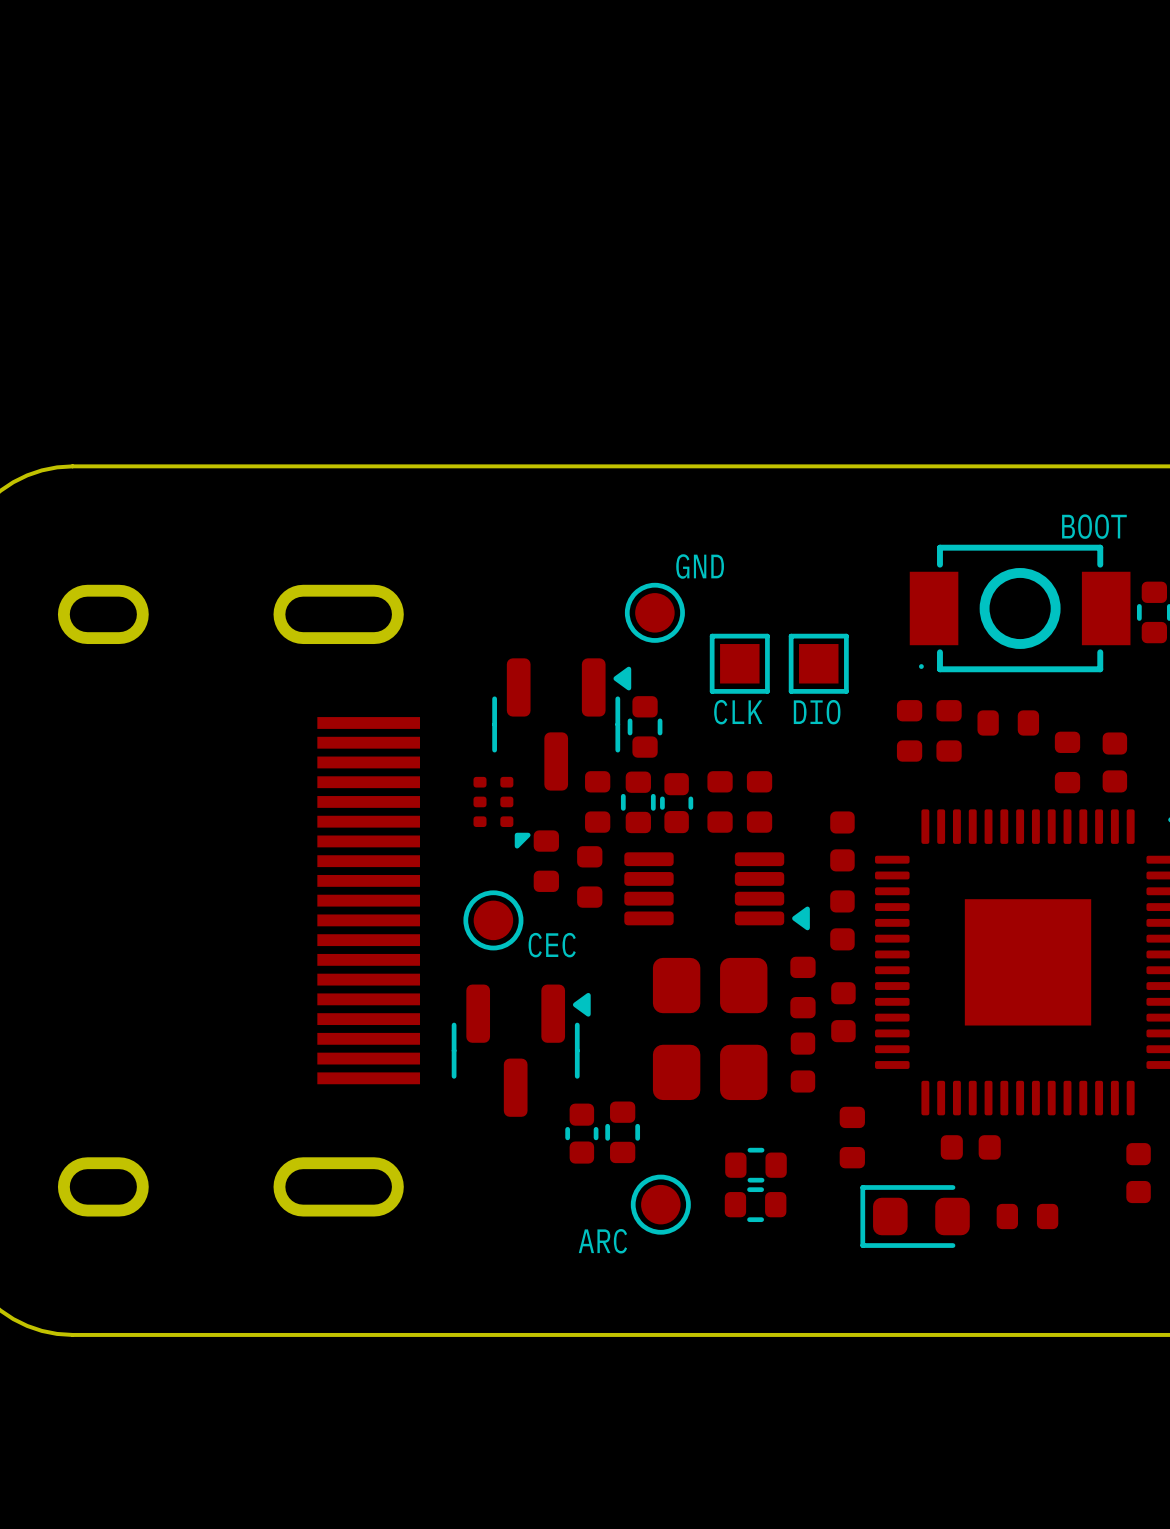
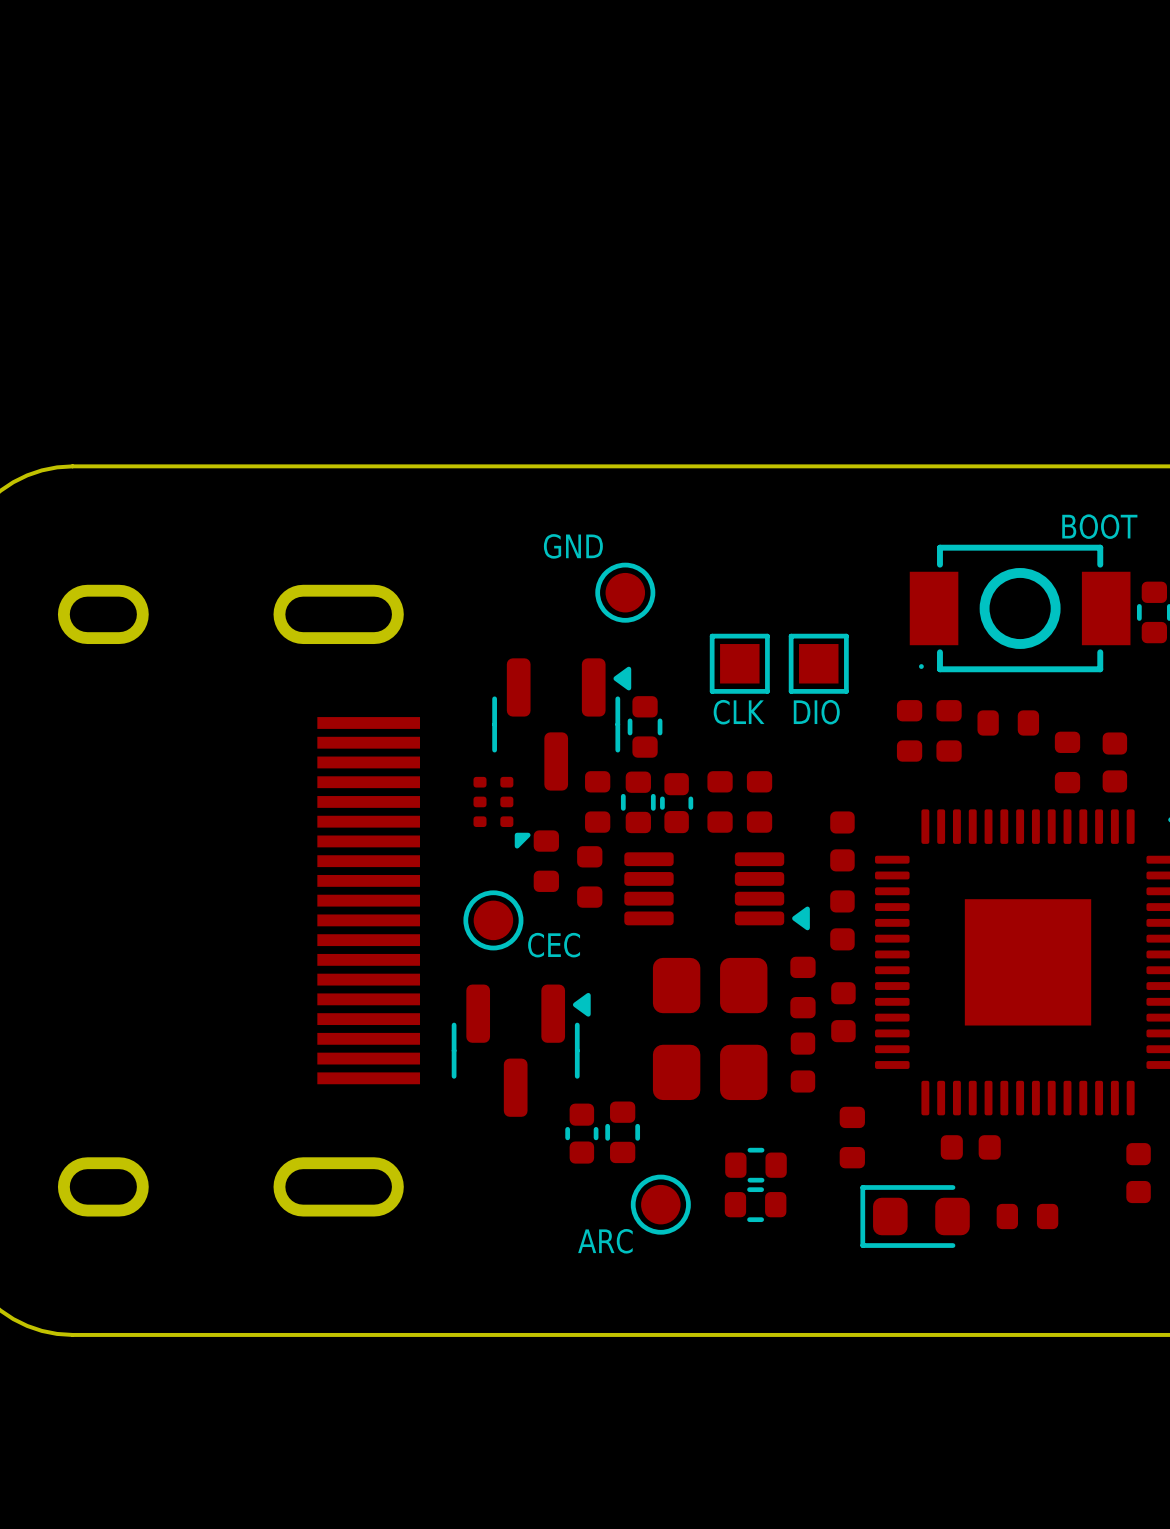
text position: GND (700, 566) -> GND (573, 546)
part position: (654, 612) -> (625, 592)

